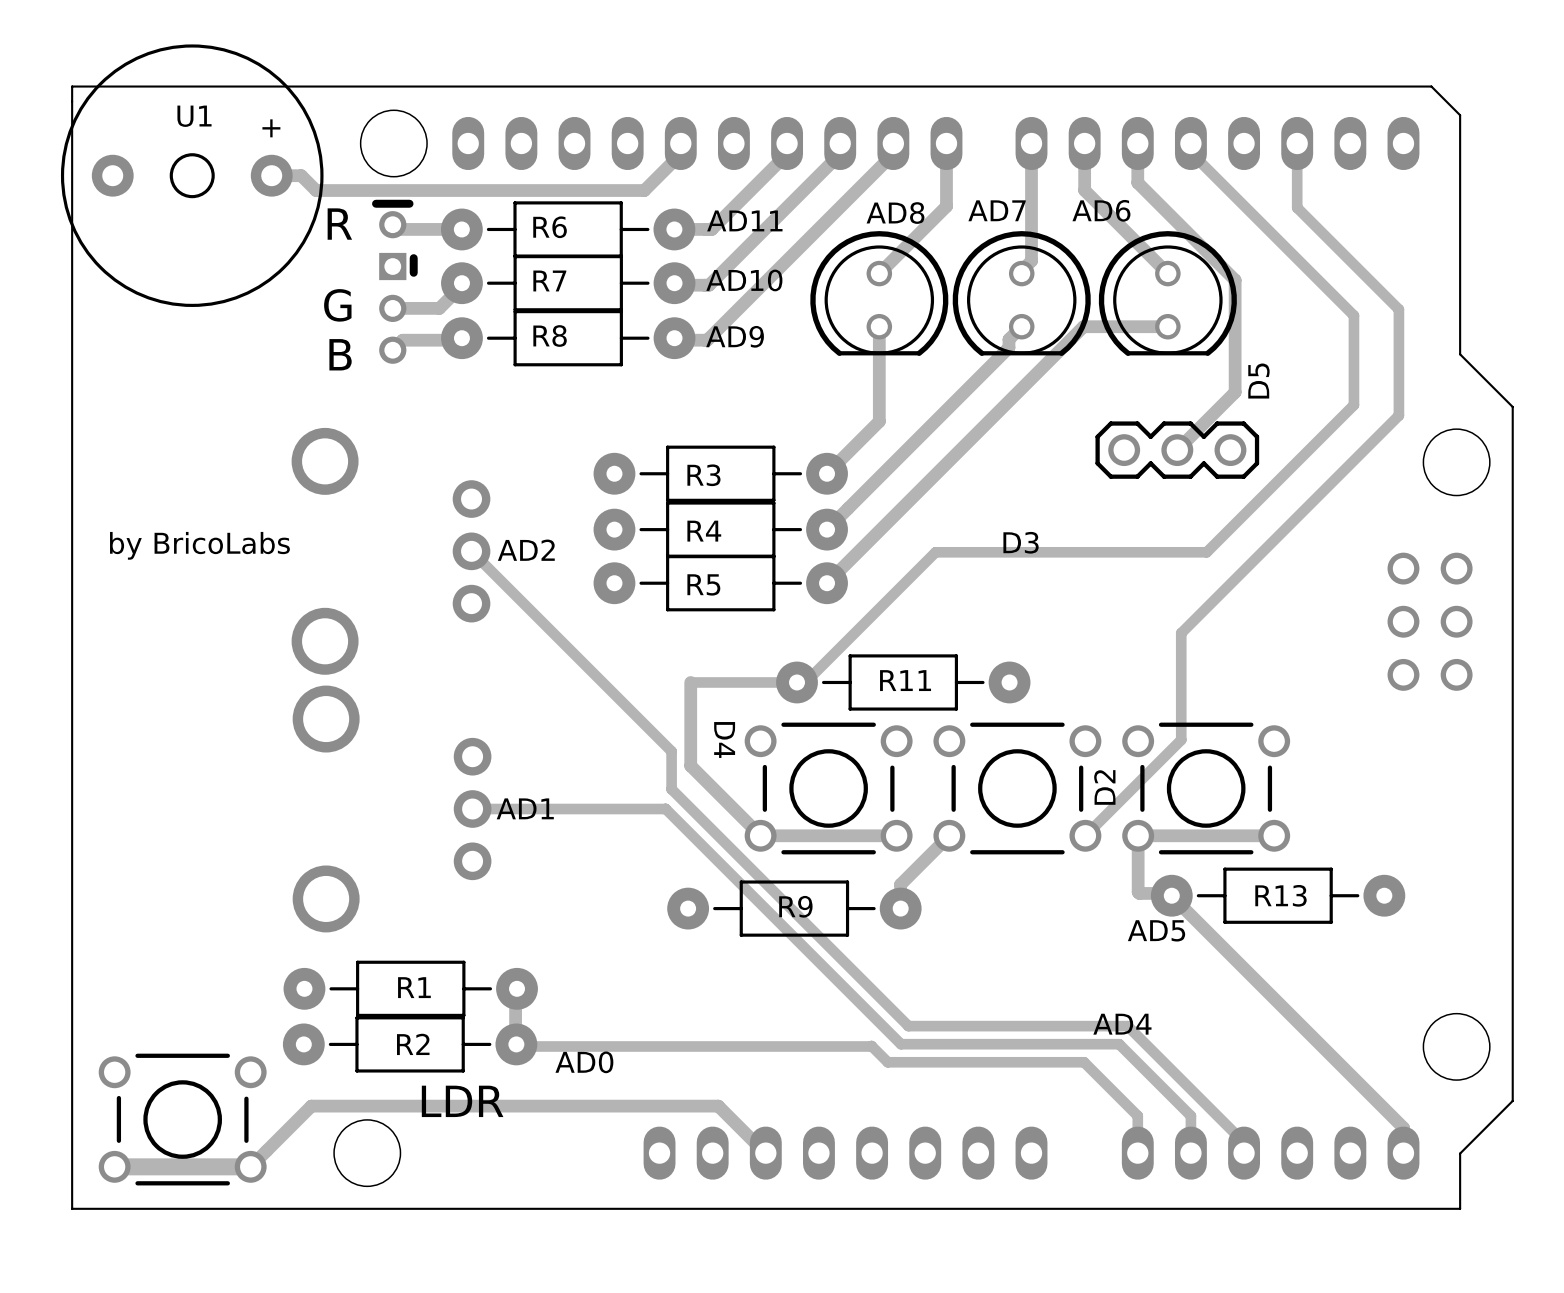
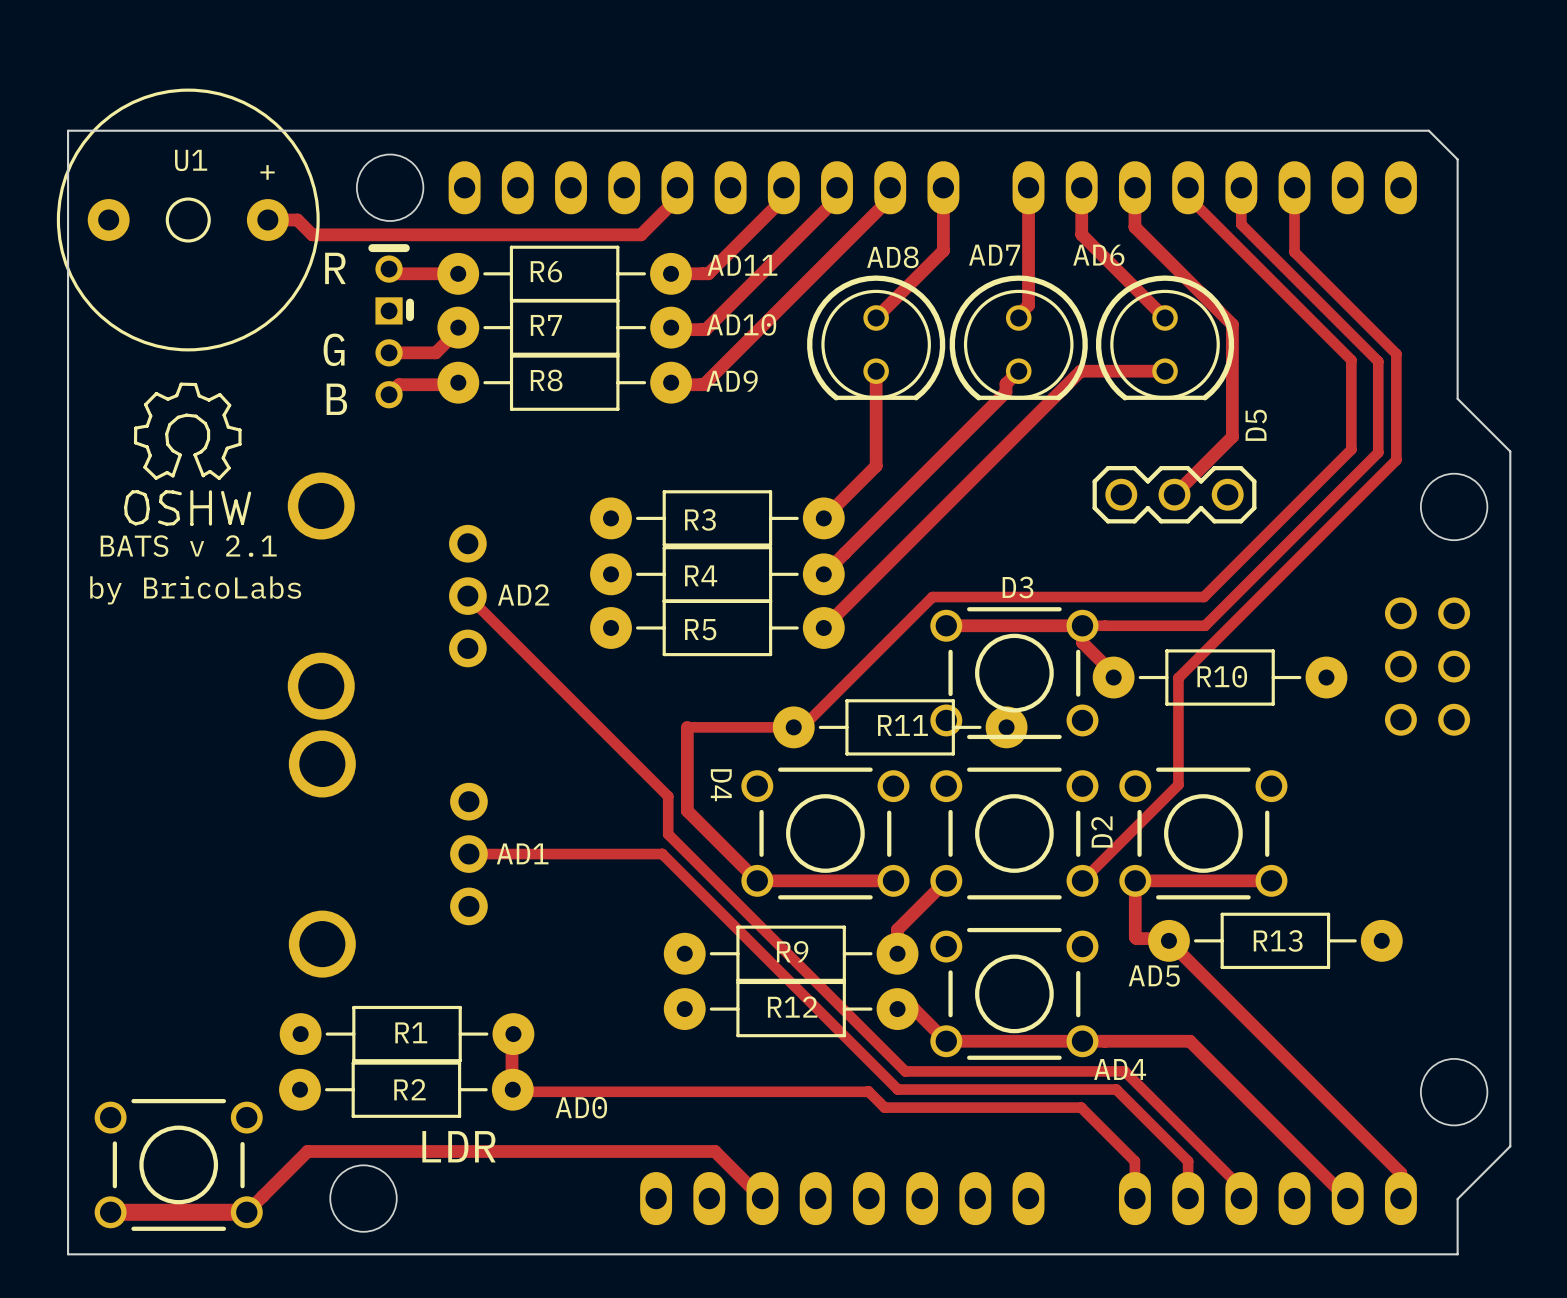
track: none -> (1241, 187) (1241, 224) (1378, 361) (1378, 452) (1205, 625) (1082, 625)
BATS v 2.1: none -> (187, 454)
track: none -> (946, 625) (1082, 625)
track: none -> (1082, 625) (1082, 642) (1113, 673)
part: none -> (1014, 673)
R10: none -> (1220, 677)
part: none -> (1014, 993)
R12: none -> (791, 1009)
track: none -> (897, 1008) (913, 1008) (946, 1041) (1189, 1041) (1347, 1198)

